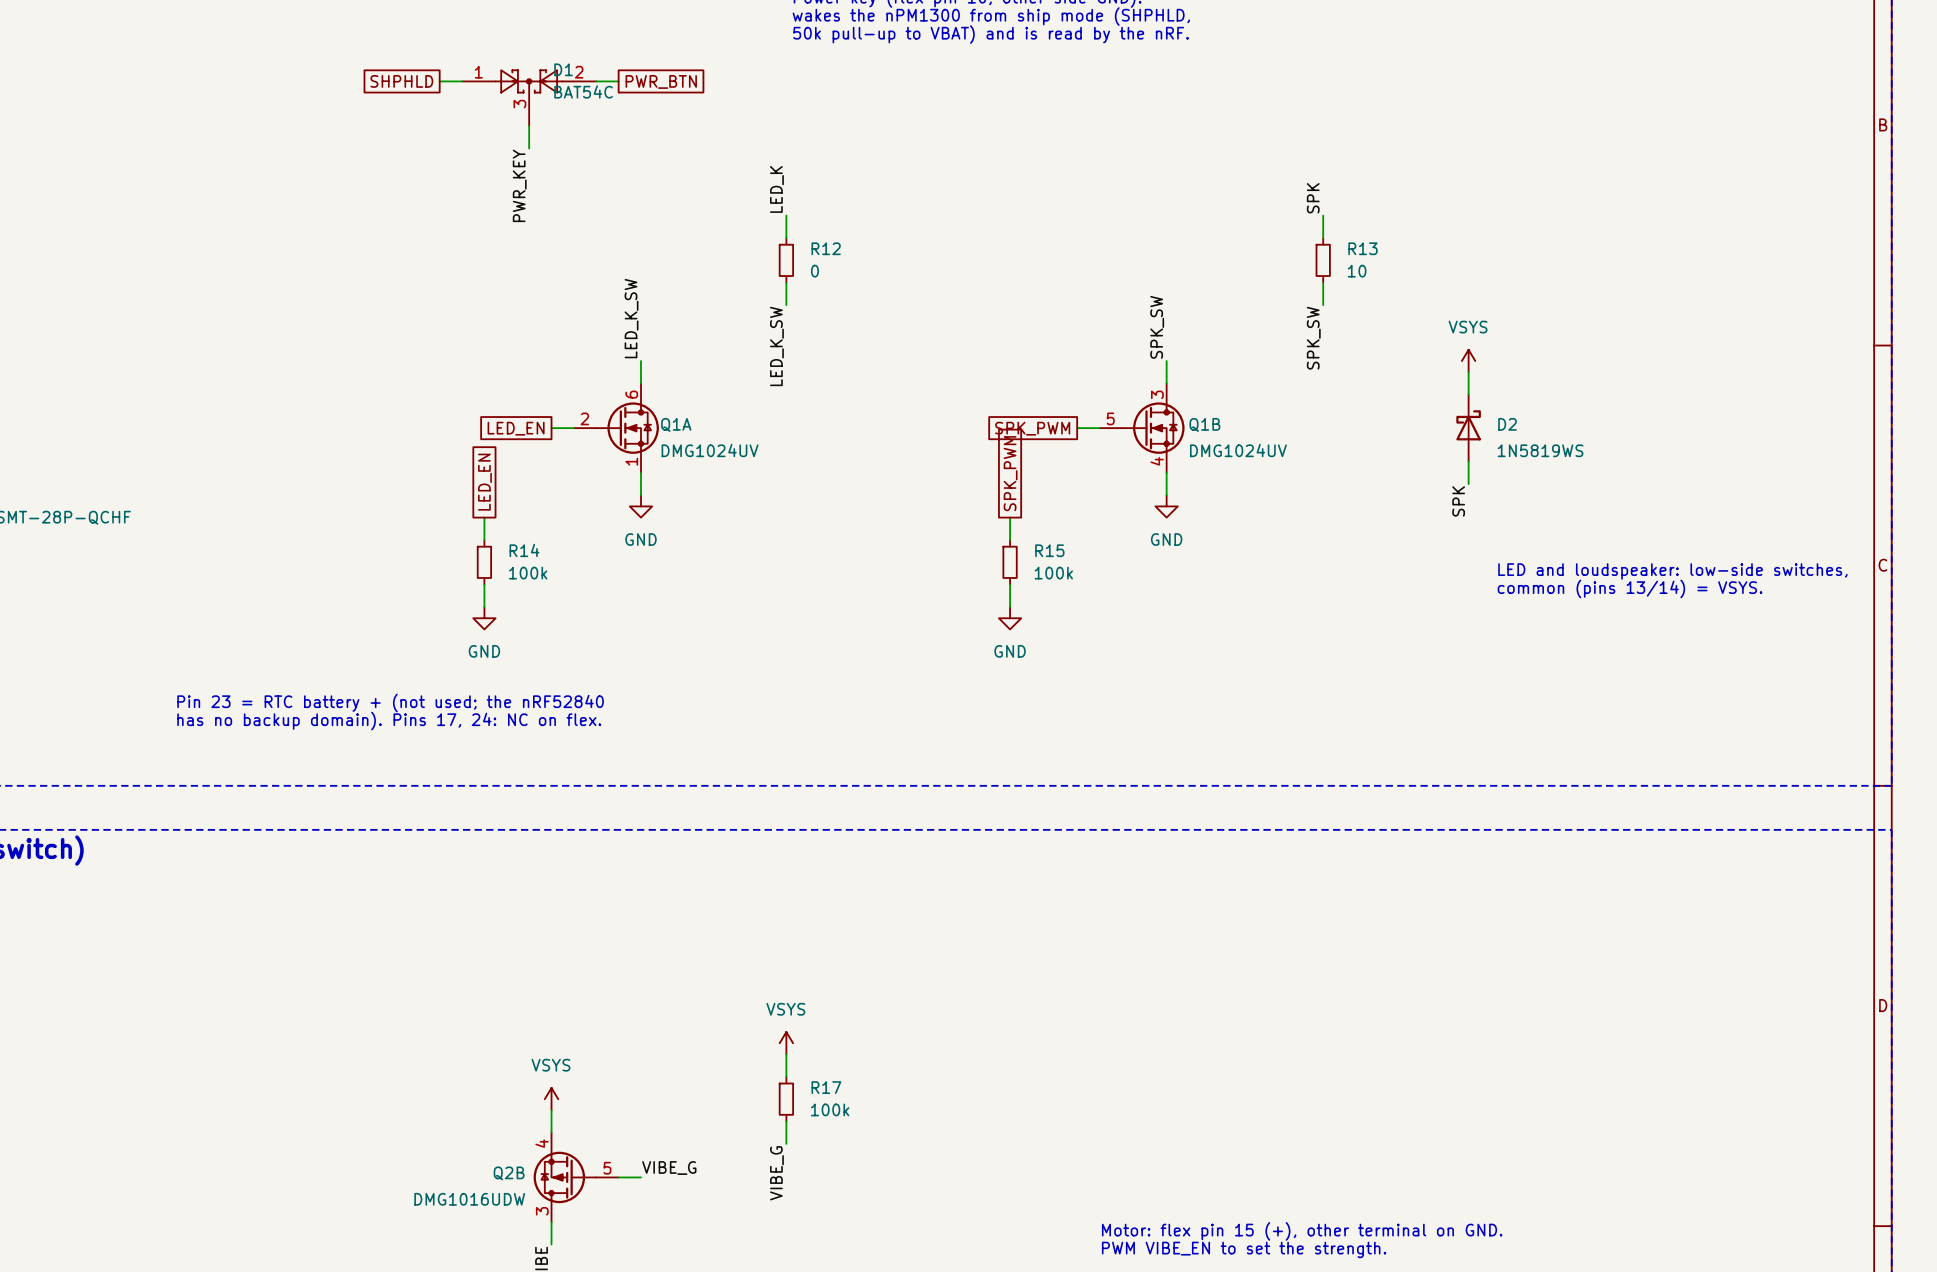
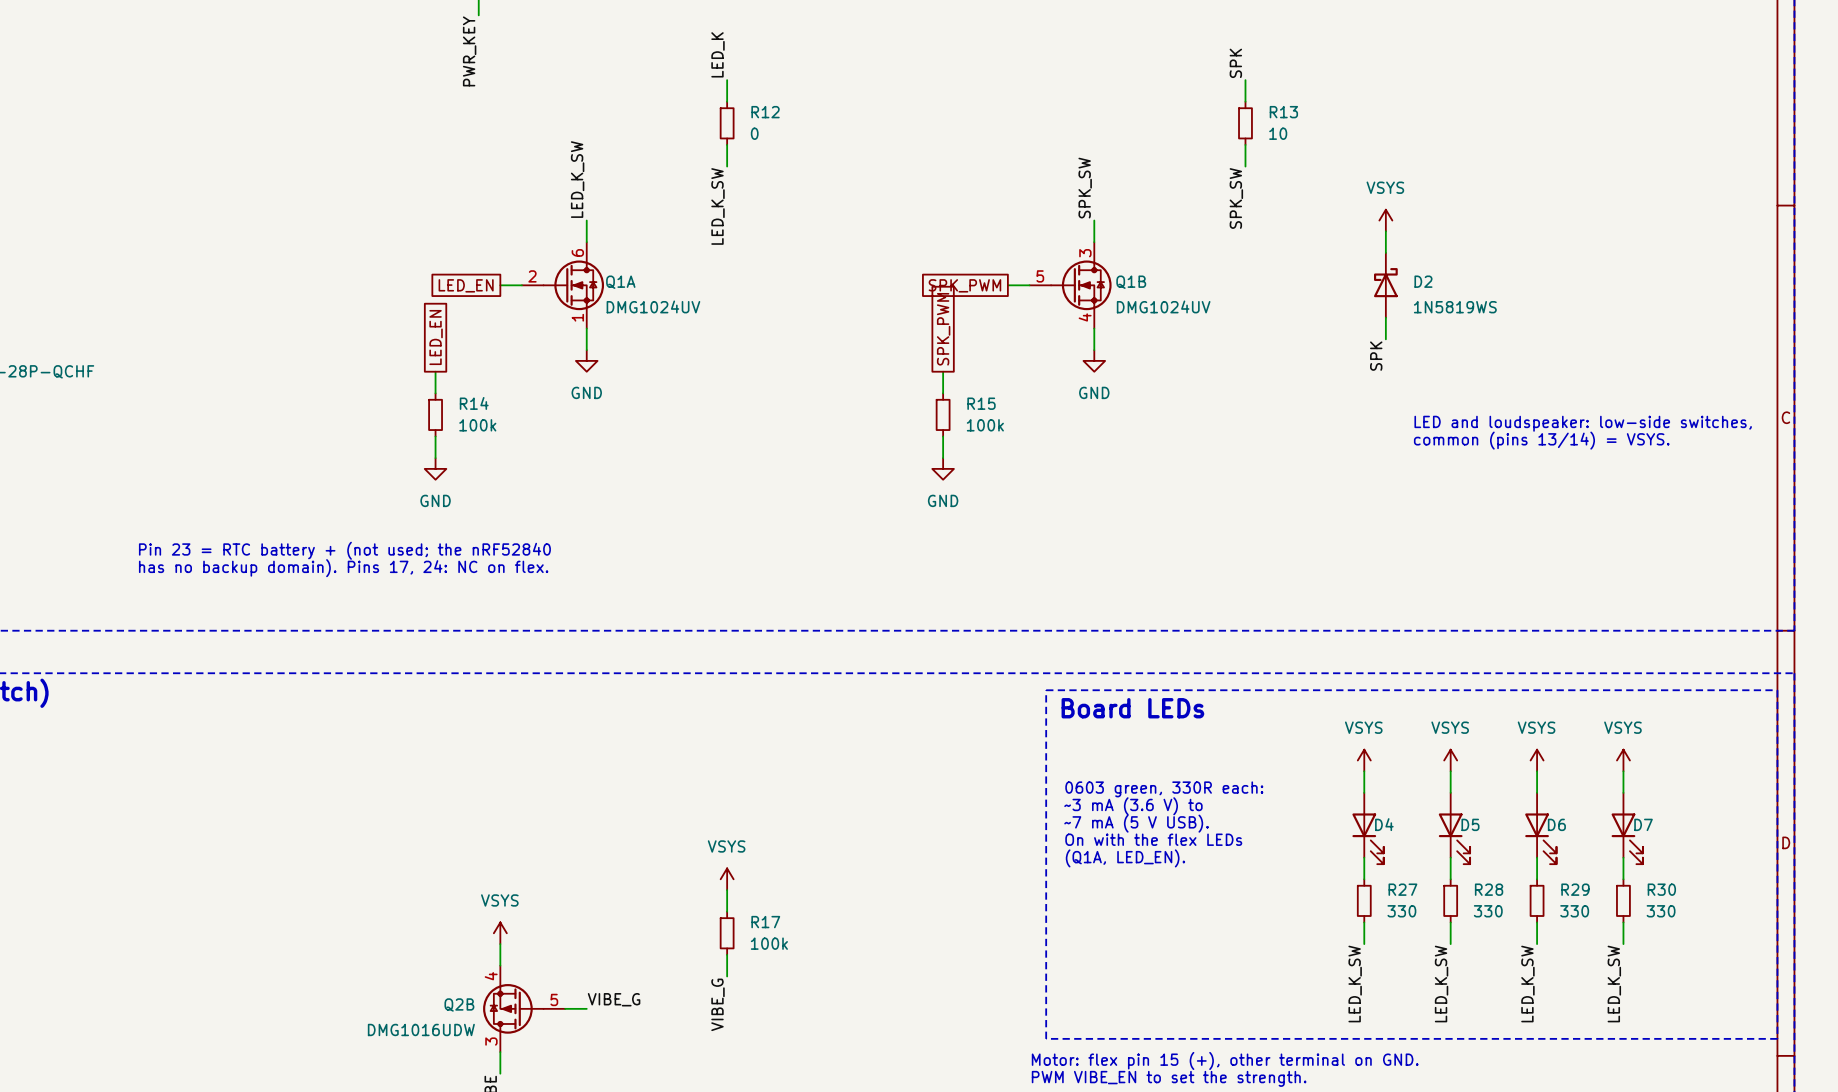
line: none -> (1046, 690) (1777, 690) (1777, 1038) (1046, 1038) (1046, 690)
text: none -> Board LEDs (1132, 708)
power symbol: none -> VSYS (1364, 760)
power symbol: none -> VSYS (1450, 760)
power symbol: none -> VSYS (1537, 760)
power symbol: none -> VSYS (1623, 760)
wire: none -> (1364, 771) (1364, 792)
wire: none -> (1450, 771) (1450, 792)
wire: none -> (1537, 771) (1537, 792)
wire: none -> (1623, 771) (1623, 792)
text: none -> 0603 green, 330R each: (1164, 789)
text: none -> ~3 mA (3.6 V) to (1133, 806)
text: none -> ~7 mA (5 V USB). (1136, 823)
D4: none -> (1368, 828)
D5: none -> (1454, 828)
D6: none -> (1540, 828)
D7: none -> (1627, 828)
text: none -> On with the flex LEDs (1153, 839)
wire: none -> (1364, 857) (1364, 879)
wire: none -> (1450, 857) (1450, 879)
wire: none -> (1537, 857) (1537, 879)
wire: none -> (1623, 857) (1623, 879)
text: none -> (Q1A, LED_EN). (1125, 858)
R27: none -> 330 (1364, 900)
R28: none -> 330 (1450, 900)
R29: none -> 330 (1537, 900)
R30: none -> 330 (1623, 900)
wire: none -> (1364, 922) (1364, 944)
wire: none -> (1450, 922) (1450, 944)
wire: none -> (1537, 922) (1537, 944)
wire: none -> (1623, 922) (1623, 944)
label: none -> LED_K_SW (1355, 984)
label: none -> LED_K_SW (1441, 984)
label: none -> LED_K_SW (1527, 984)
label: none -> LED_K_SW (1614, 984)

